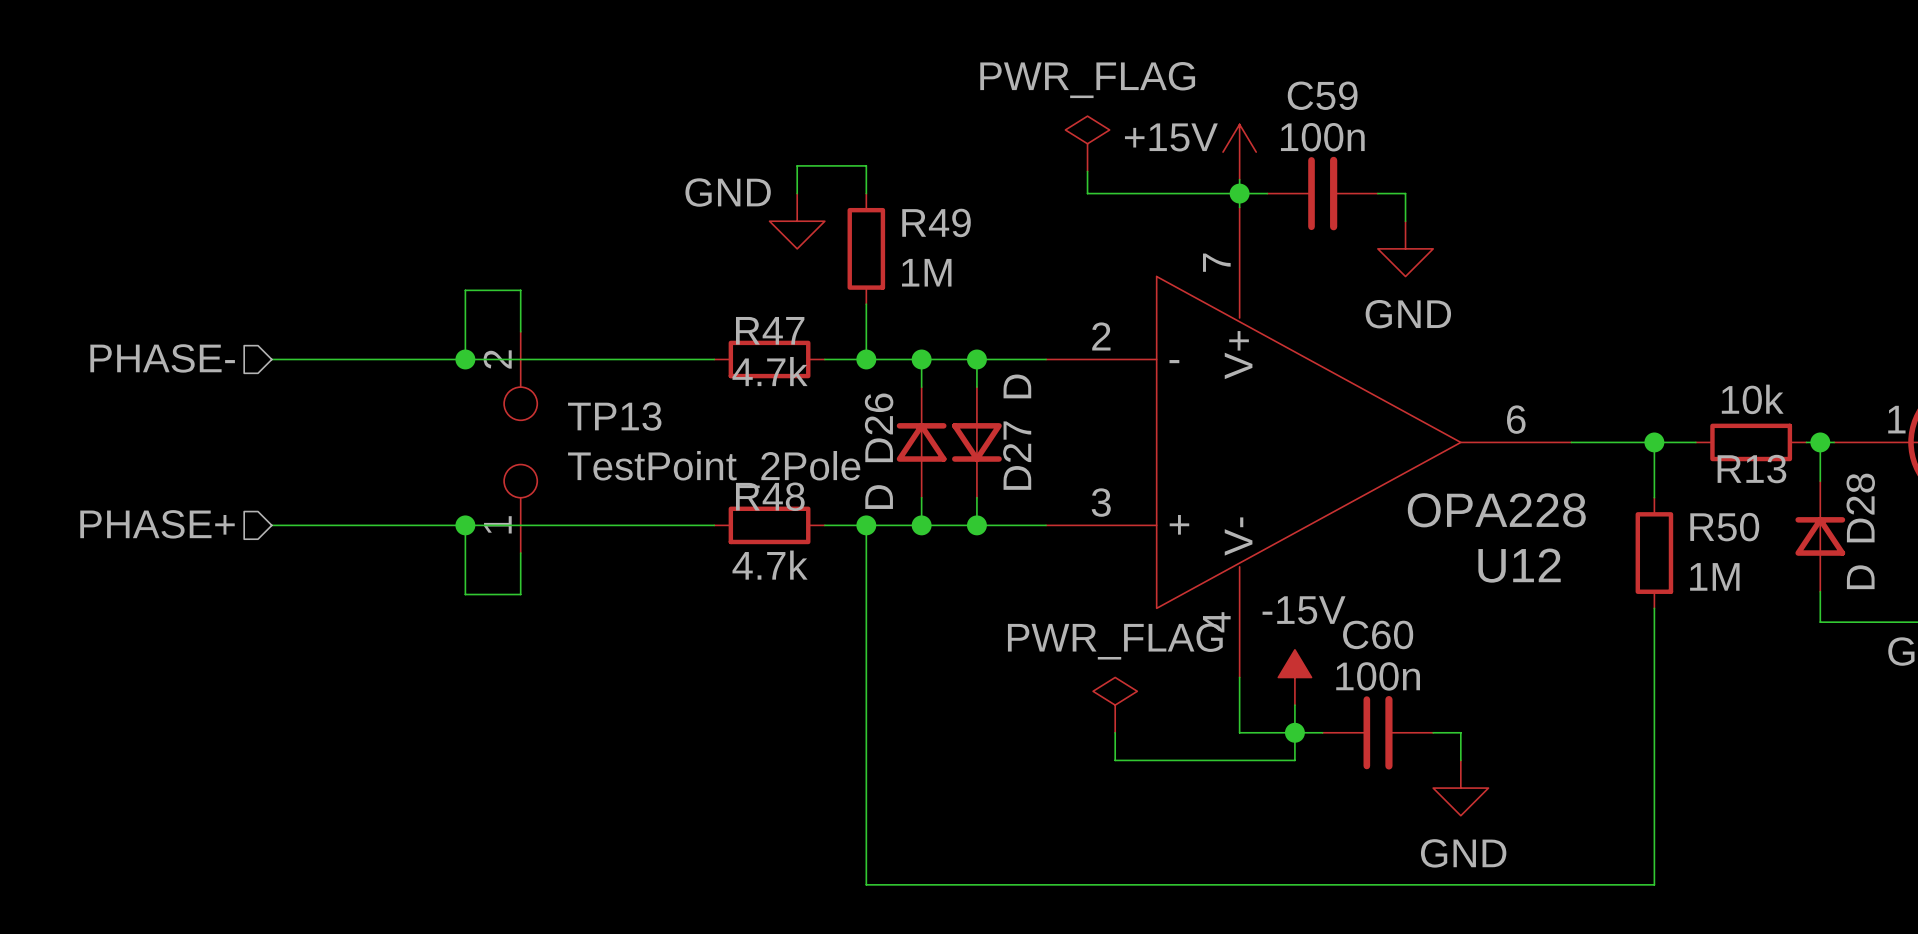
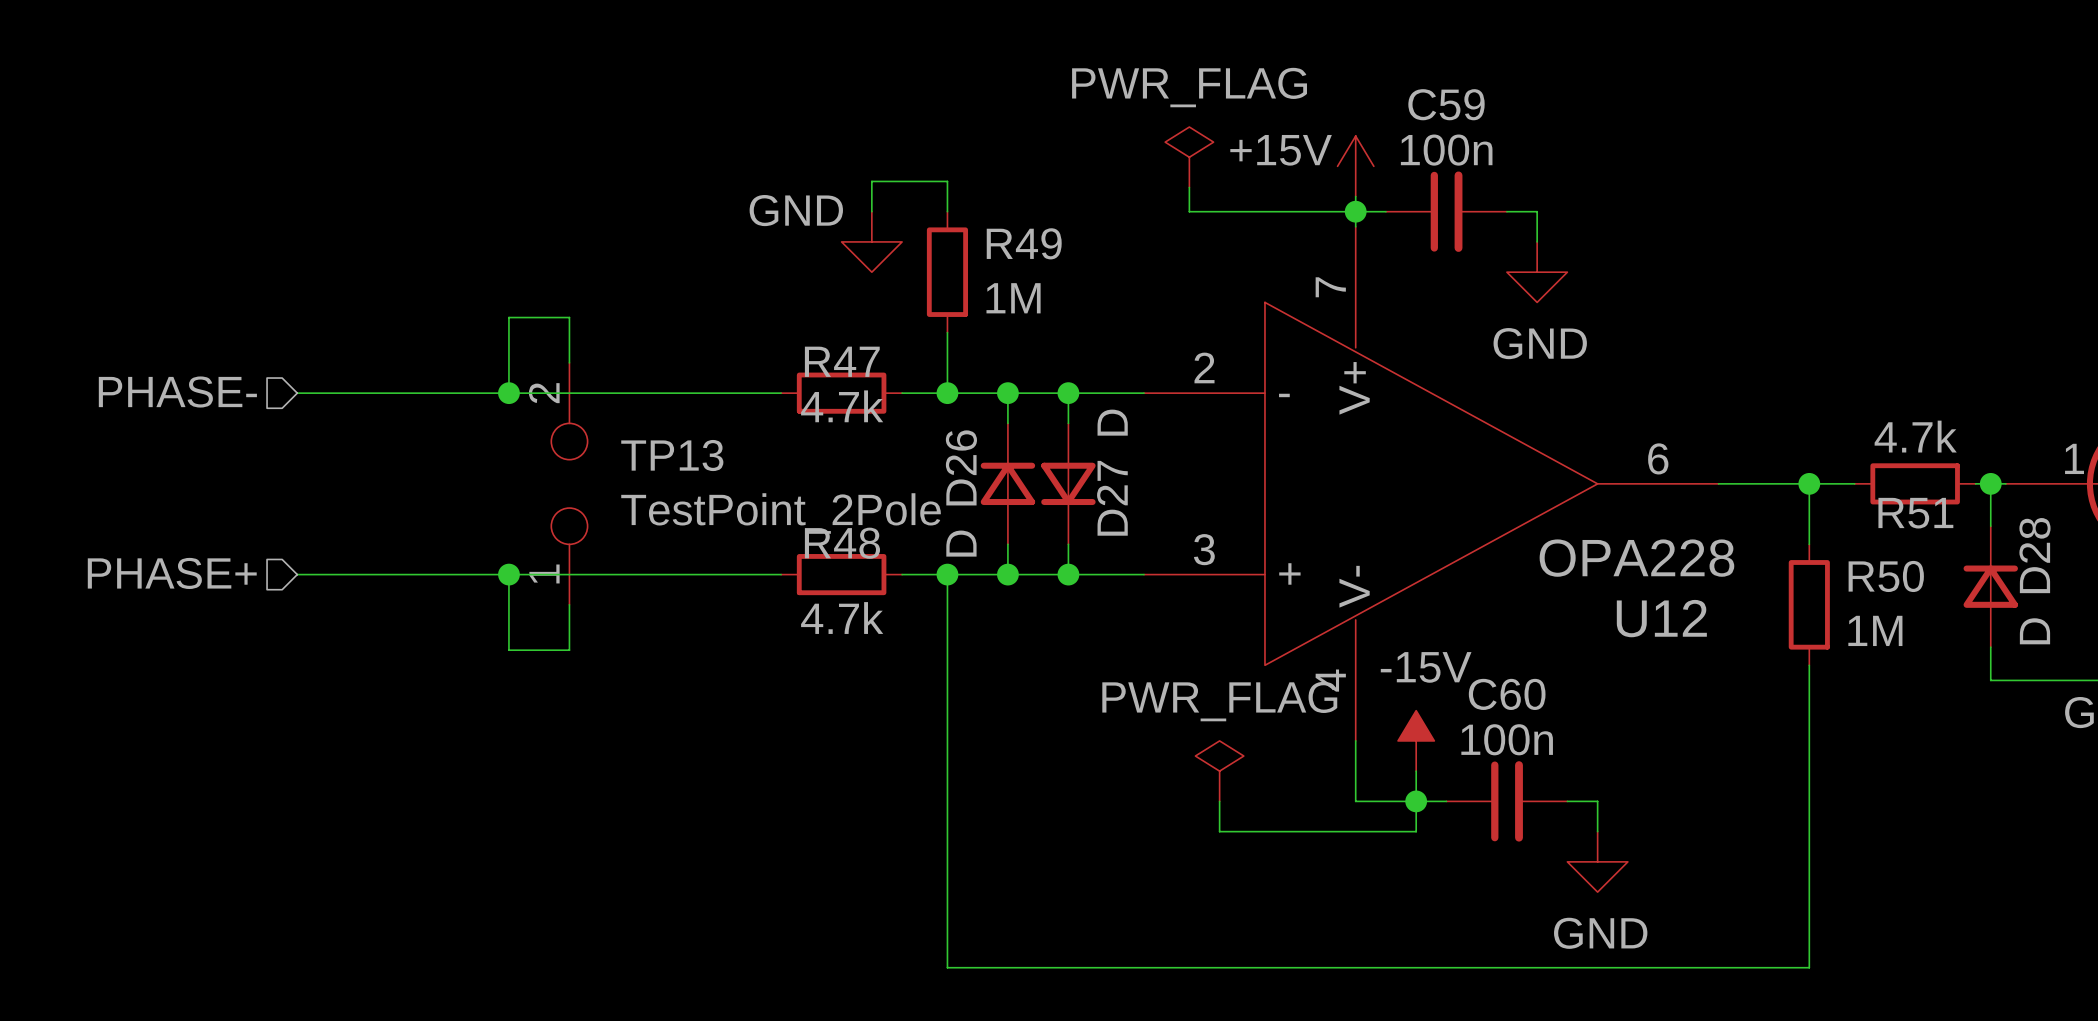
R13 value: 10k (1752, 399) -> 4.7k (1915, 436)
R13 name: R13 (1751, 469) -> R51 (1915, 513)

